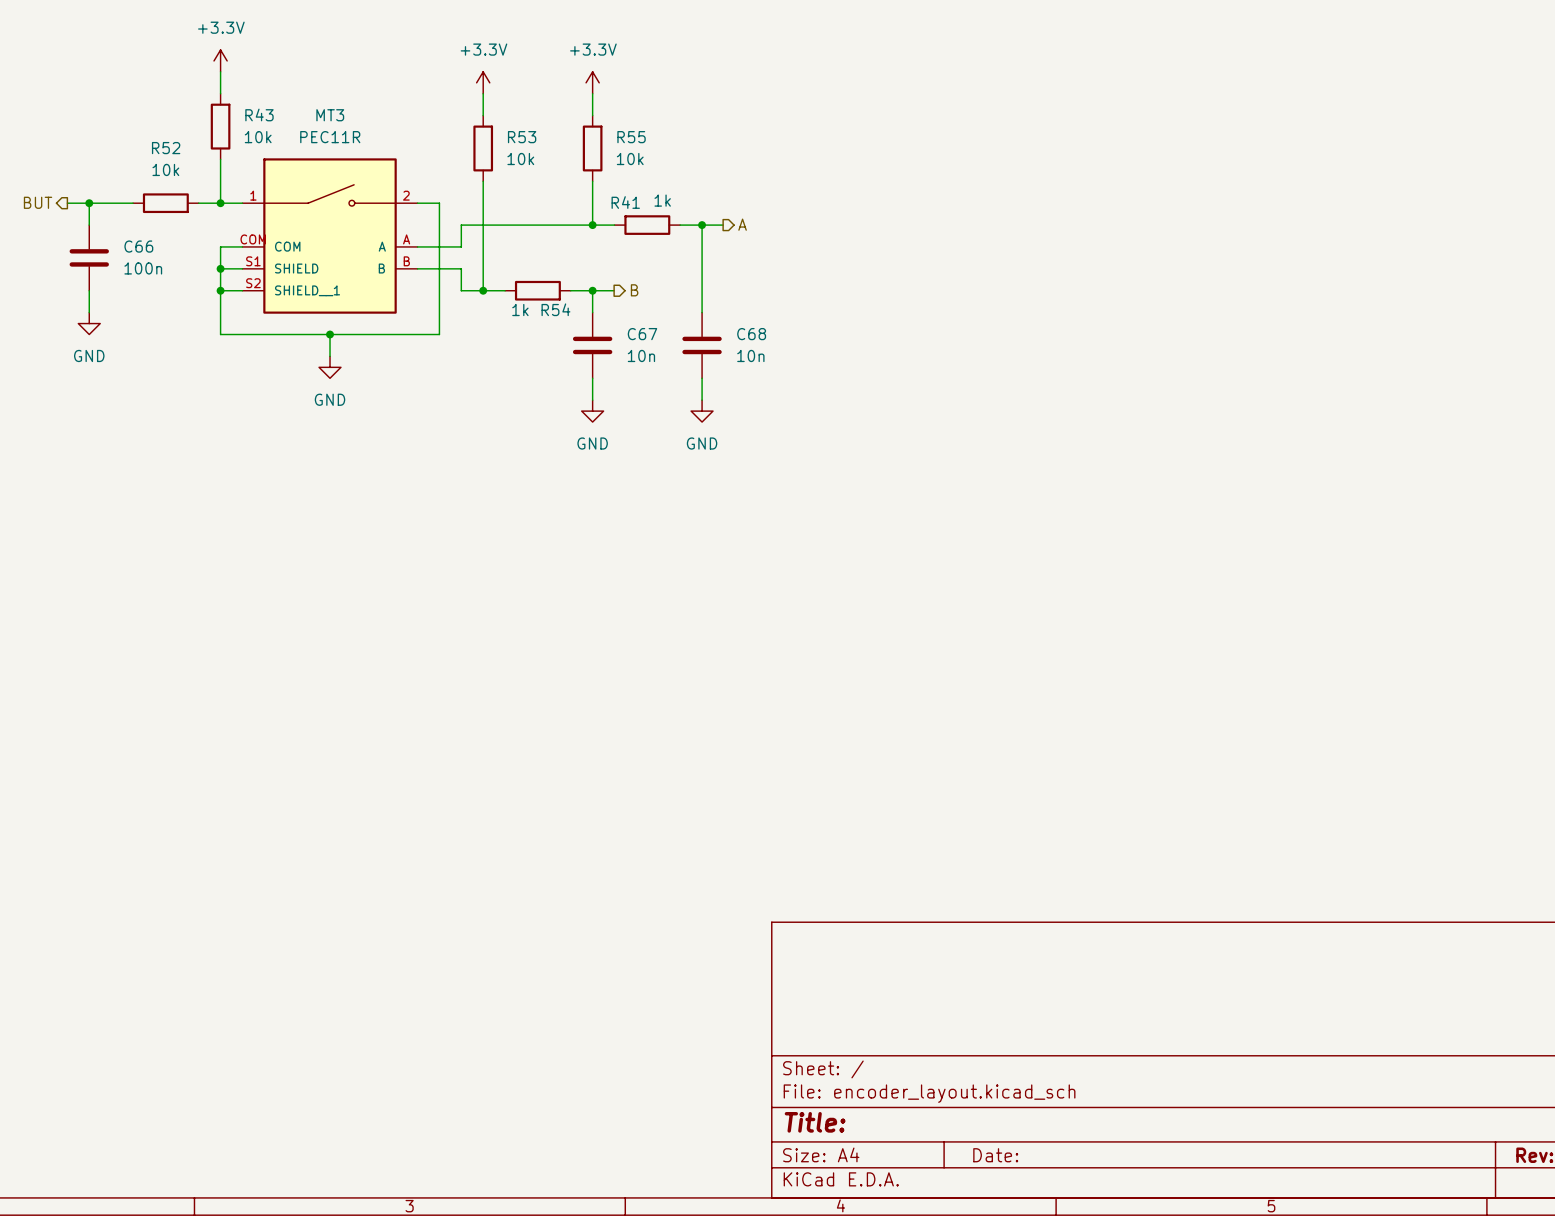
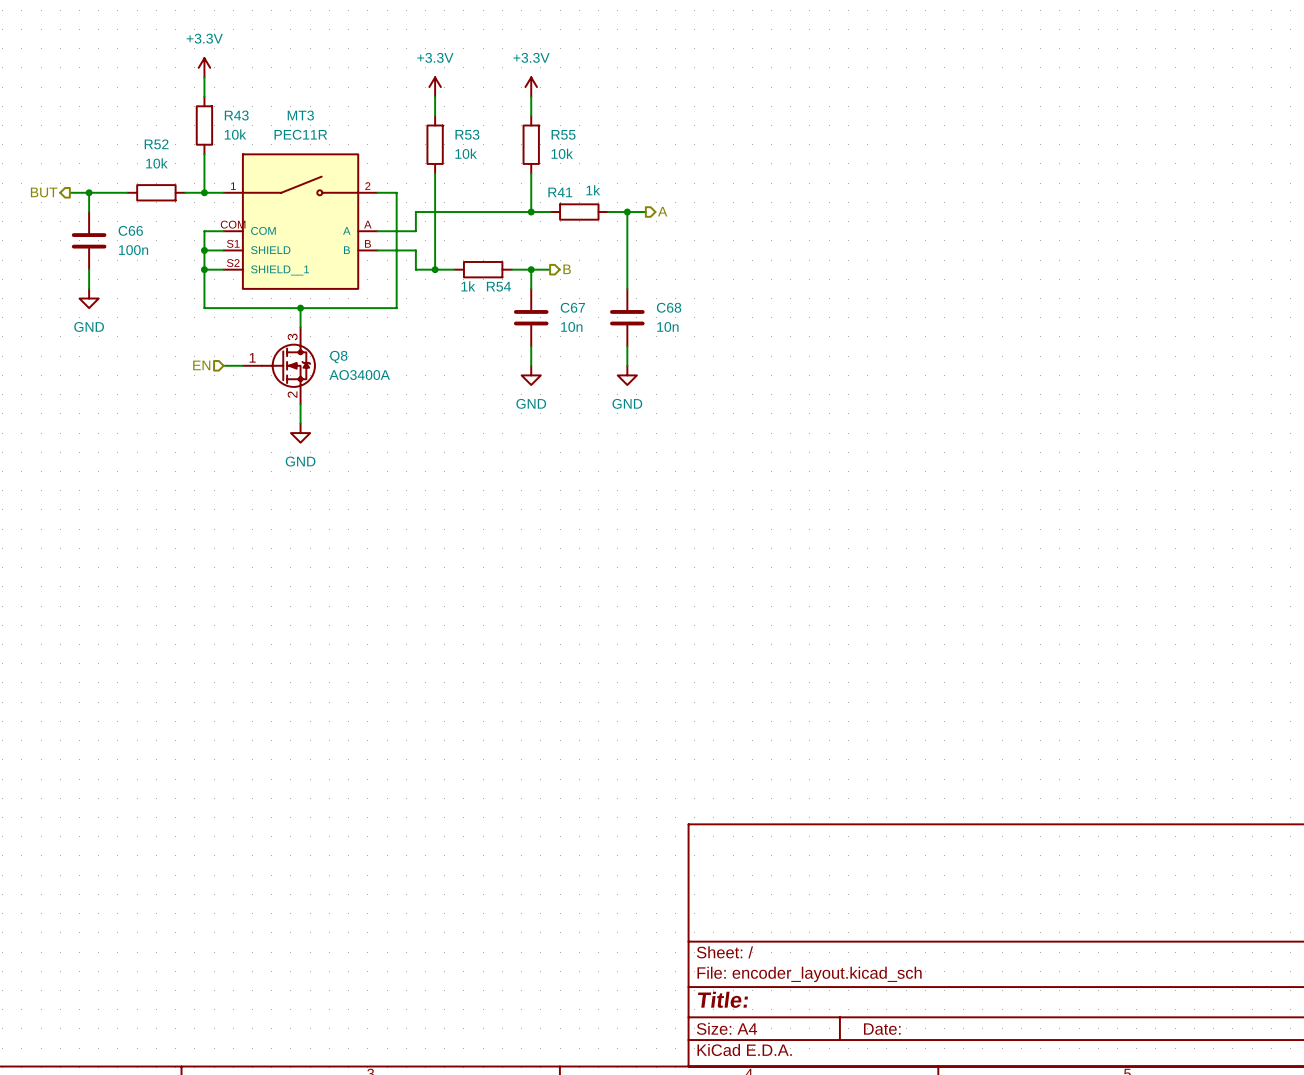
power symbol position: GND (330, 367) -> GND (300, 433)
hierarchical label: none -> EN (201, 365)
wire: none -> (223, 365) (242, 365)
Q8: none -> AO3400A (279, 365)
wire: none -> (300, 404) (300, 423)

